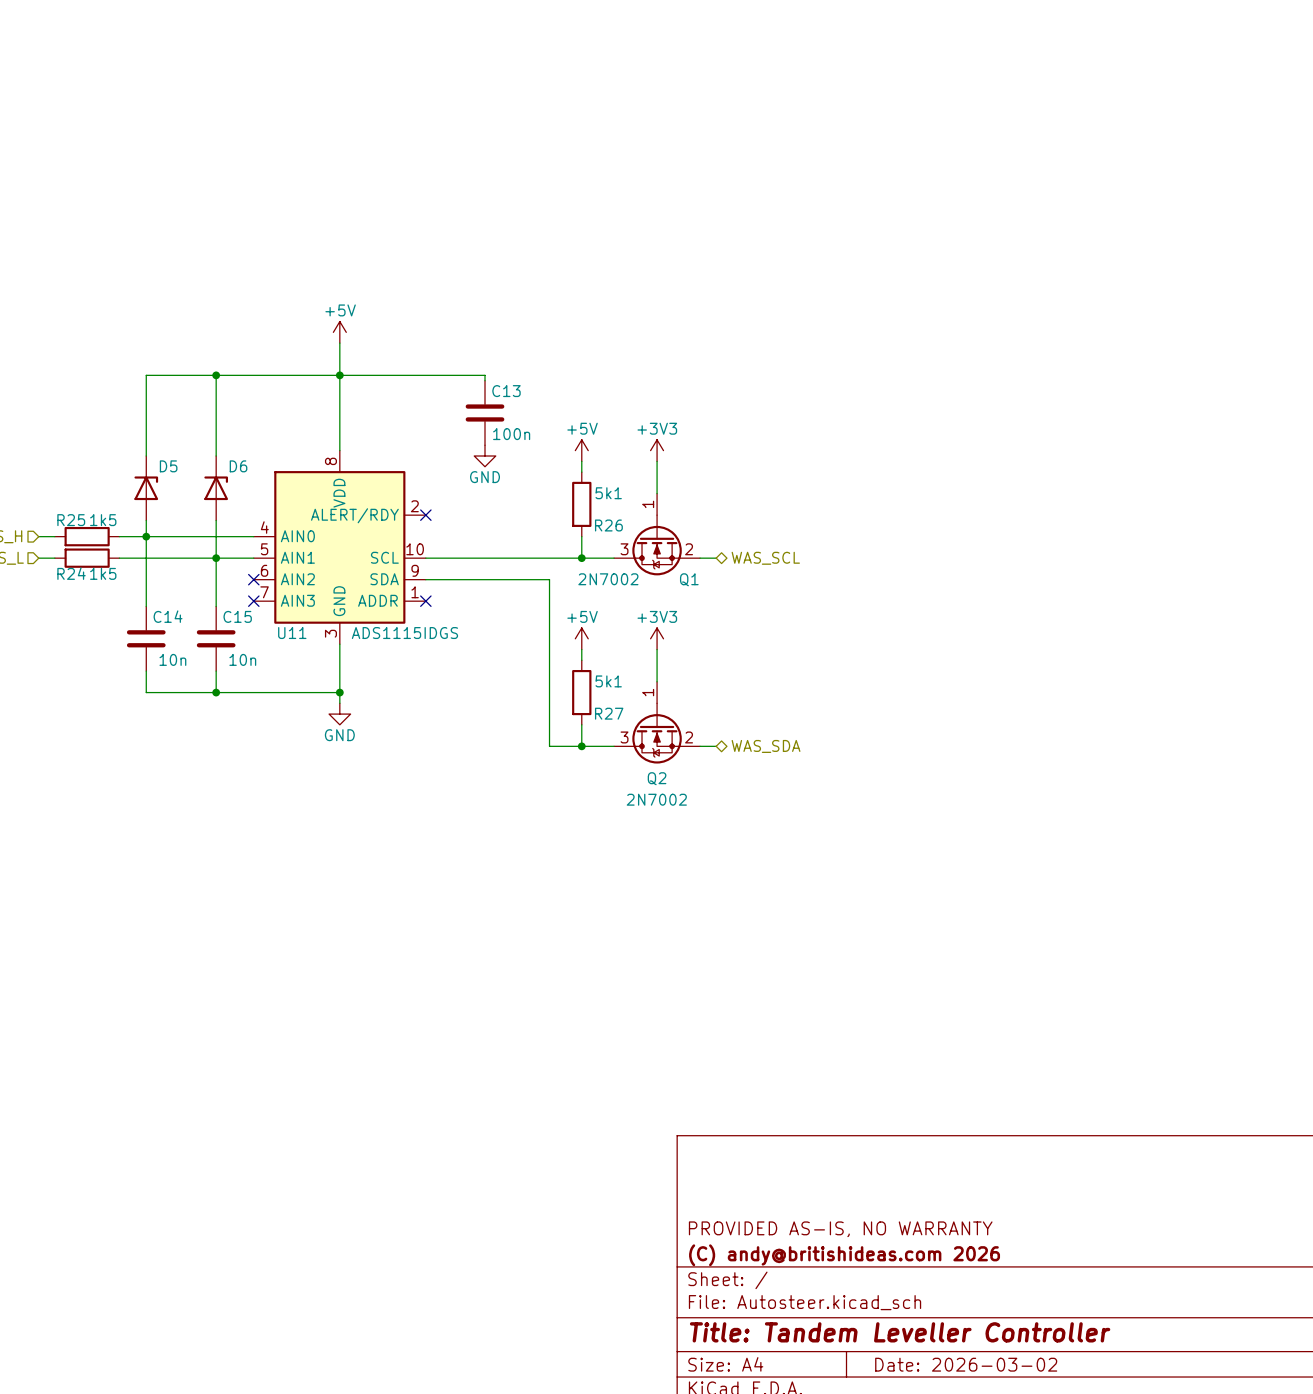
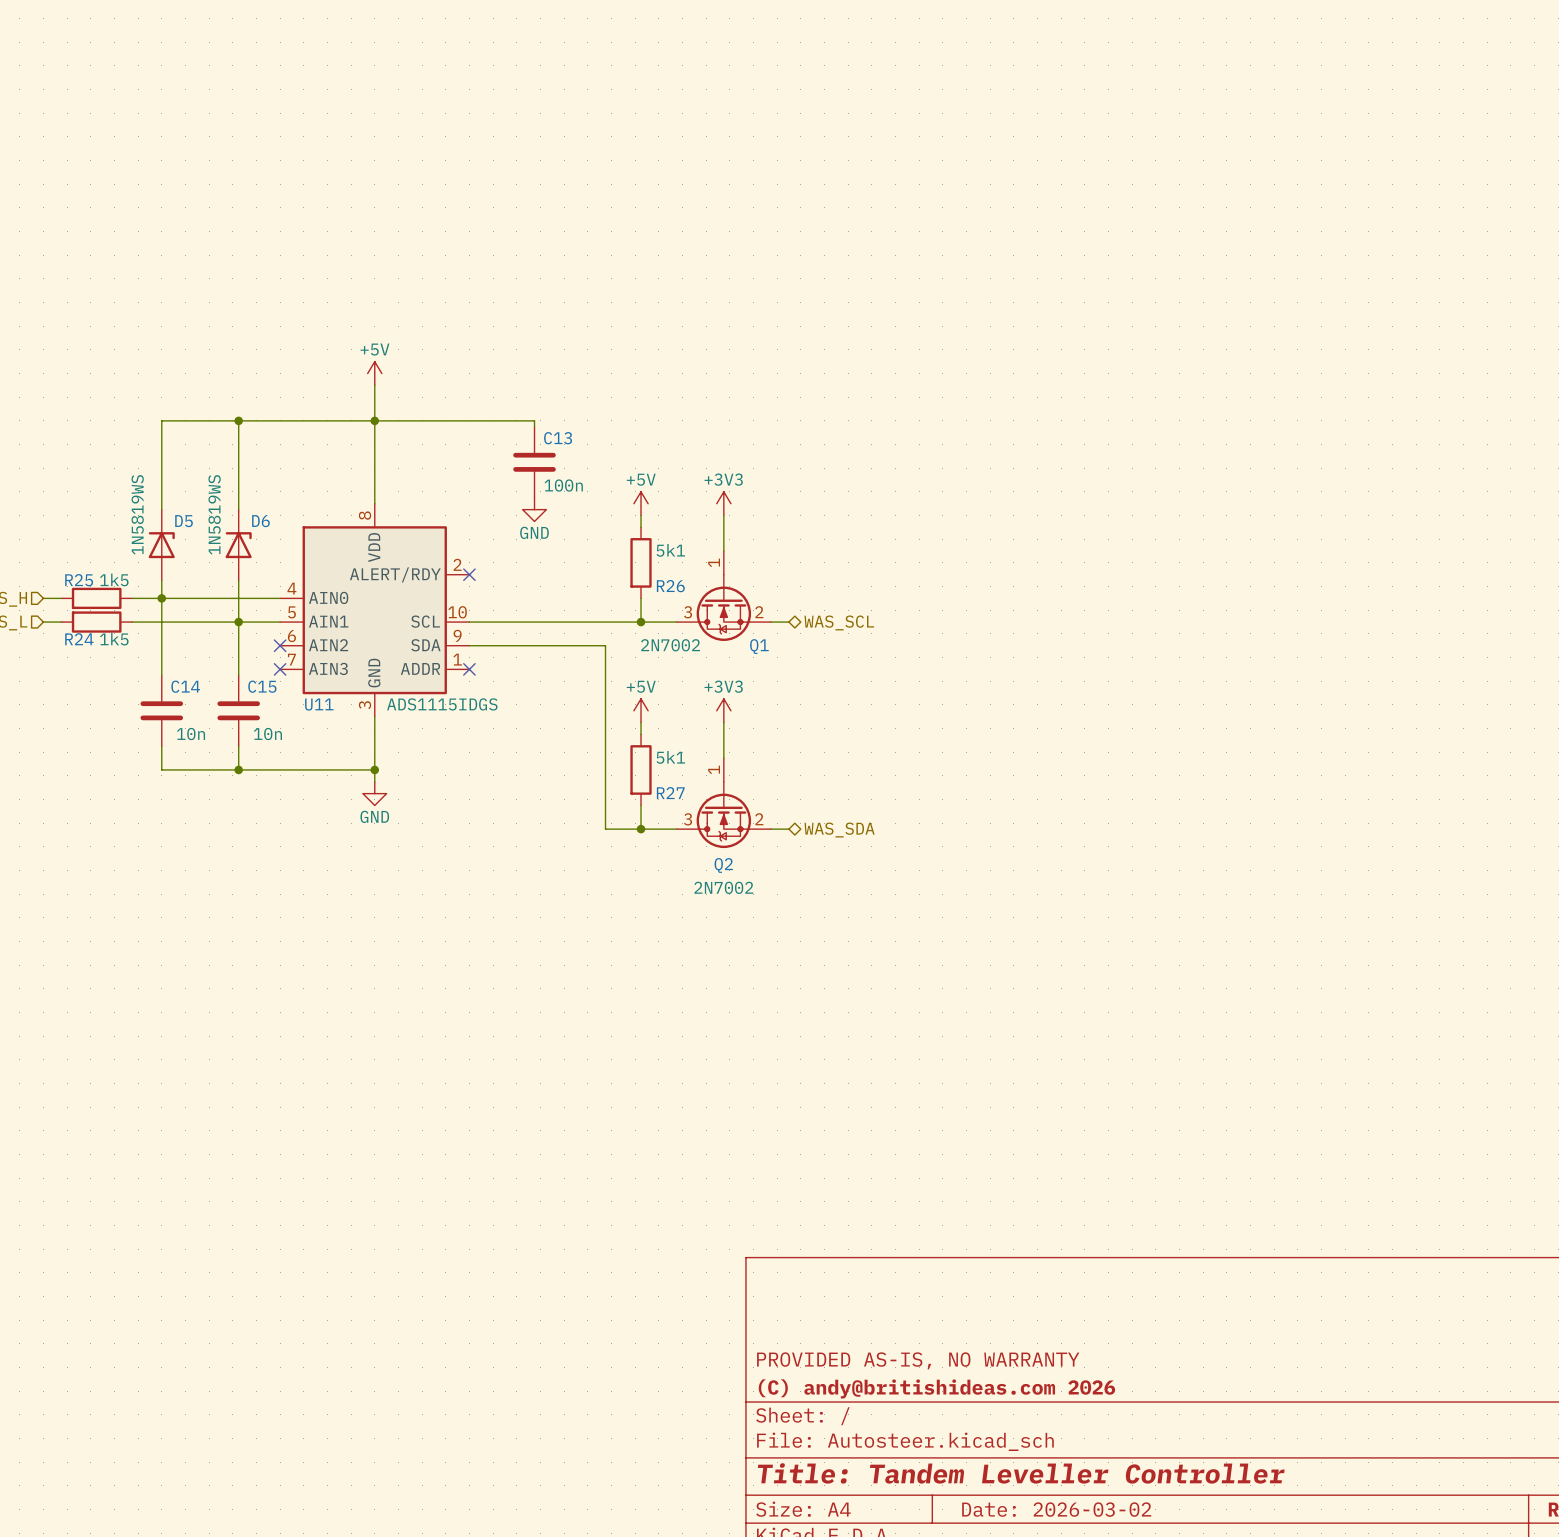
D5 value: none -> 1N5819WS (137, 514)
D6 value: none -> 1N5819WS (214, 514)

